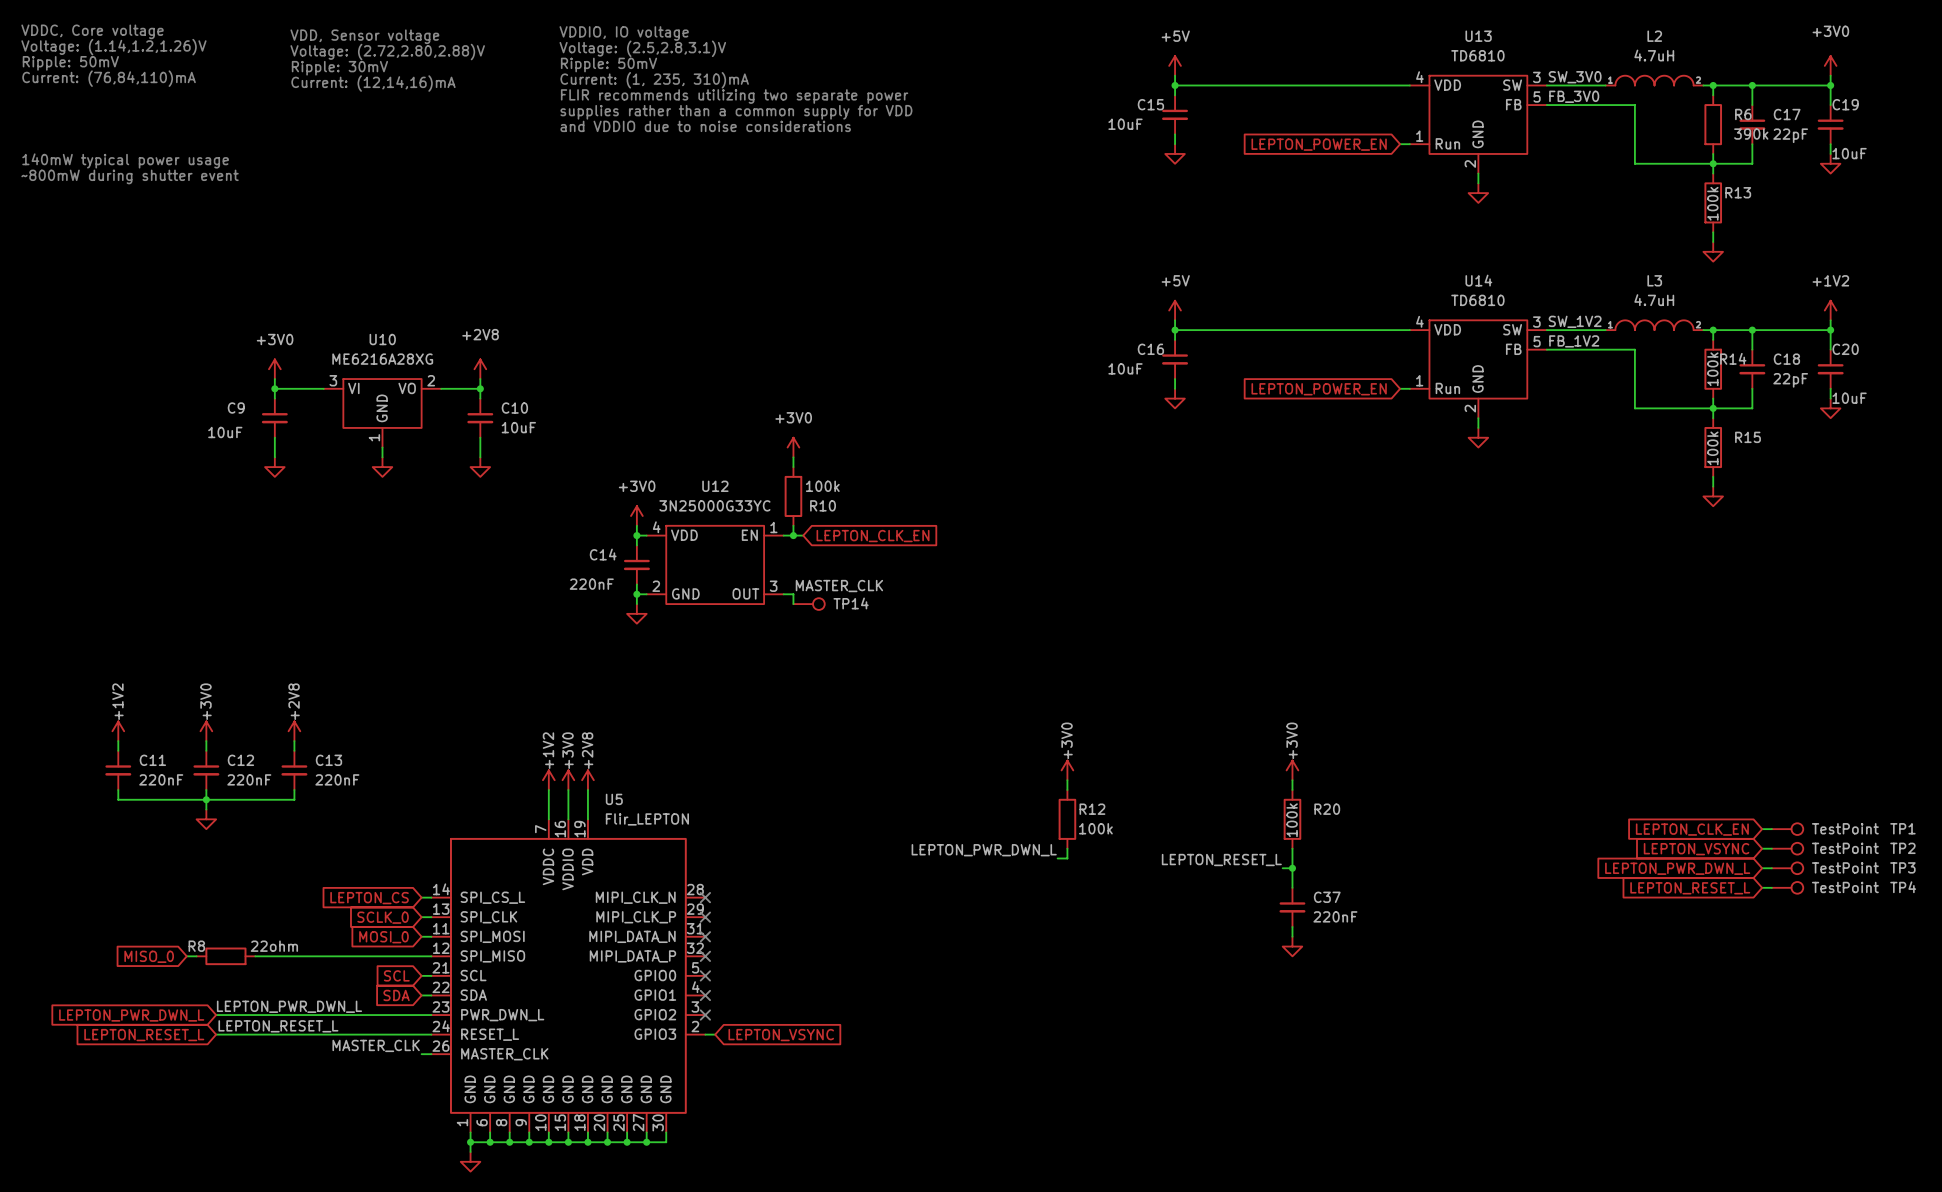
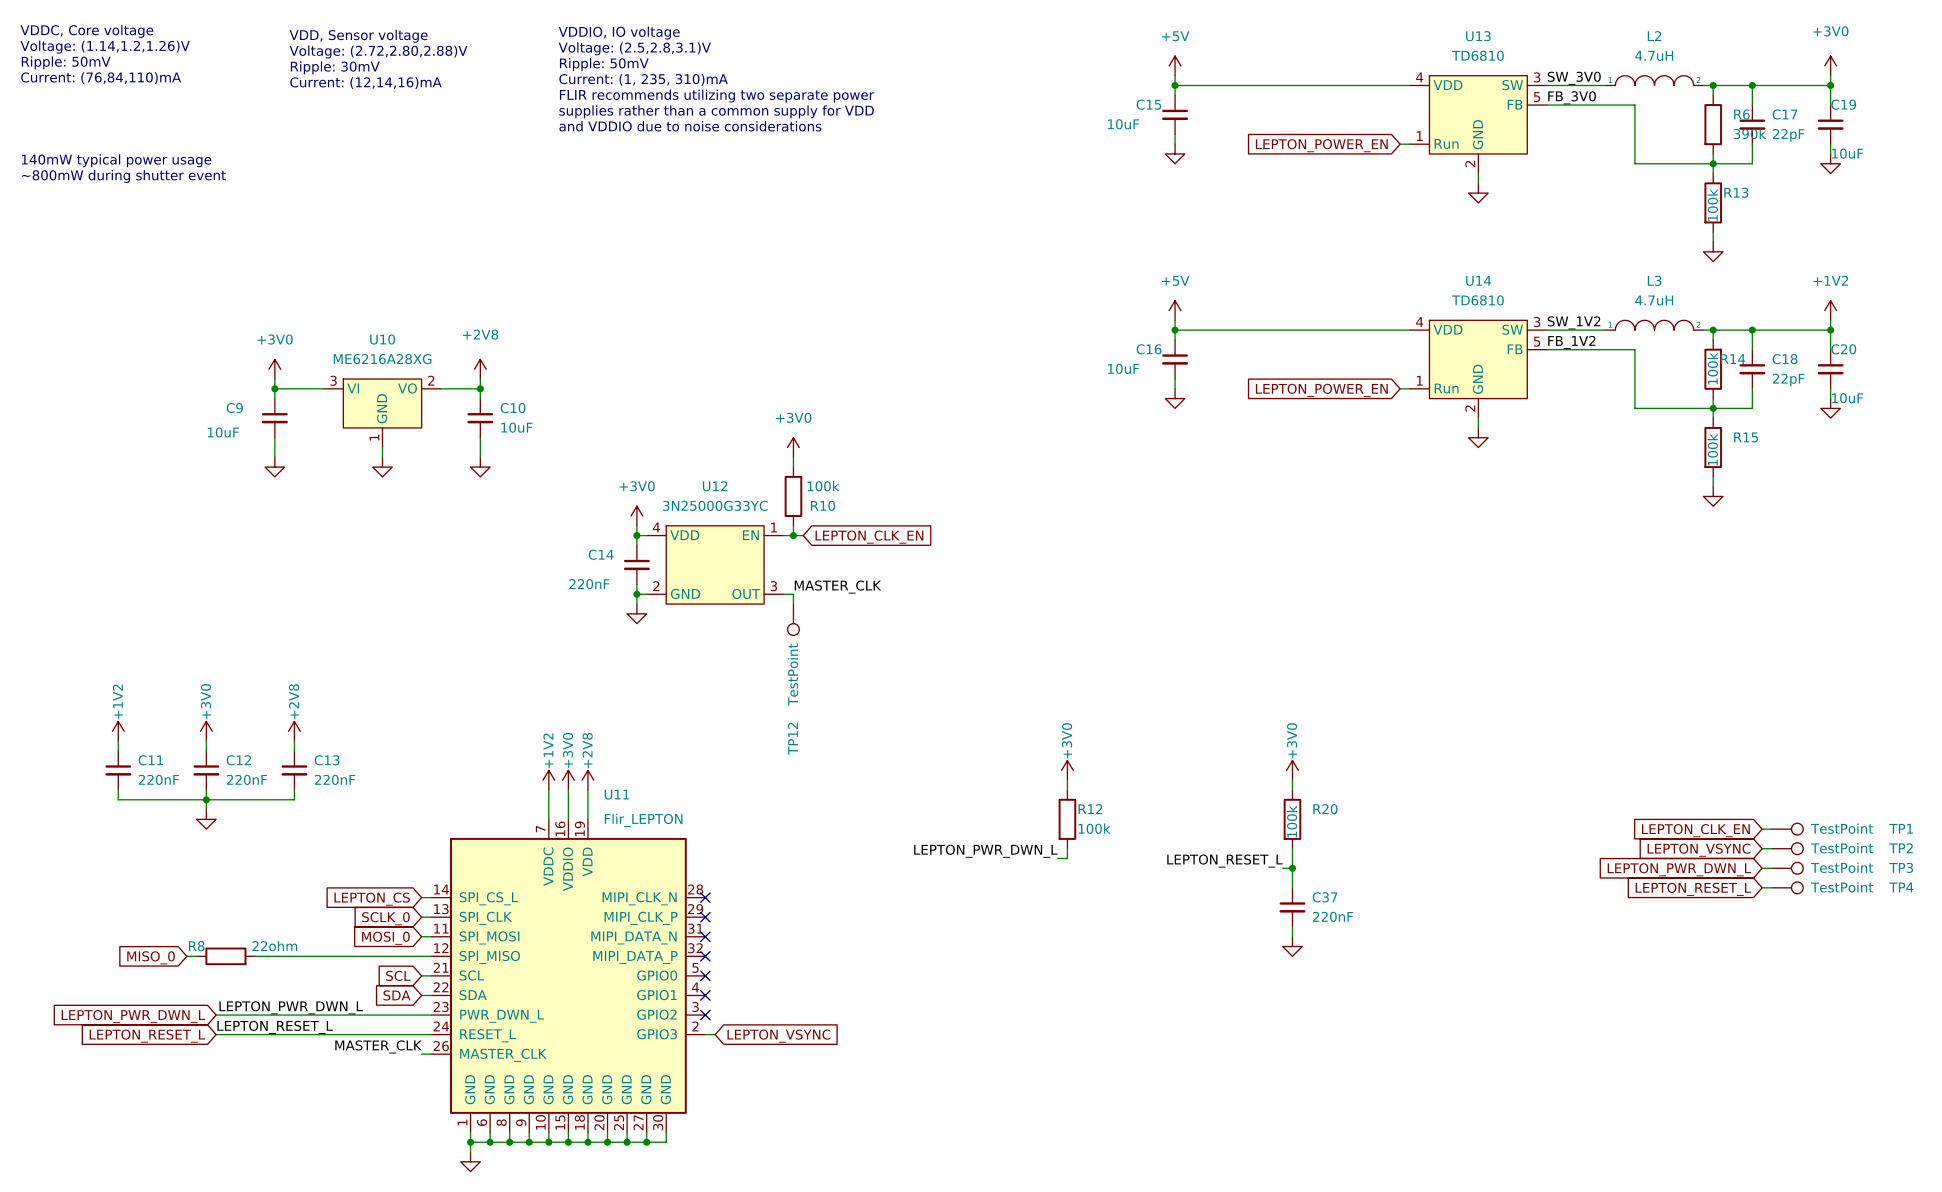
TP14: (809, 604) -> none
TP12: none -> TestPoint (793, 619)
U5 name: U5 (614, 799) -> U11 (616, 794)

